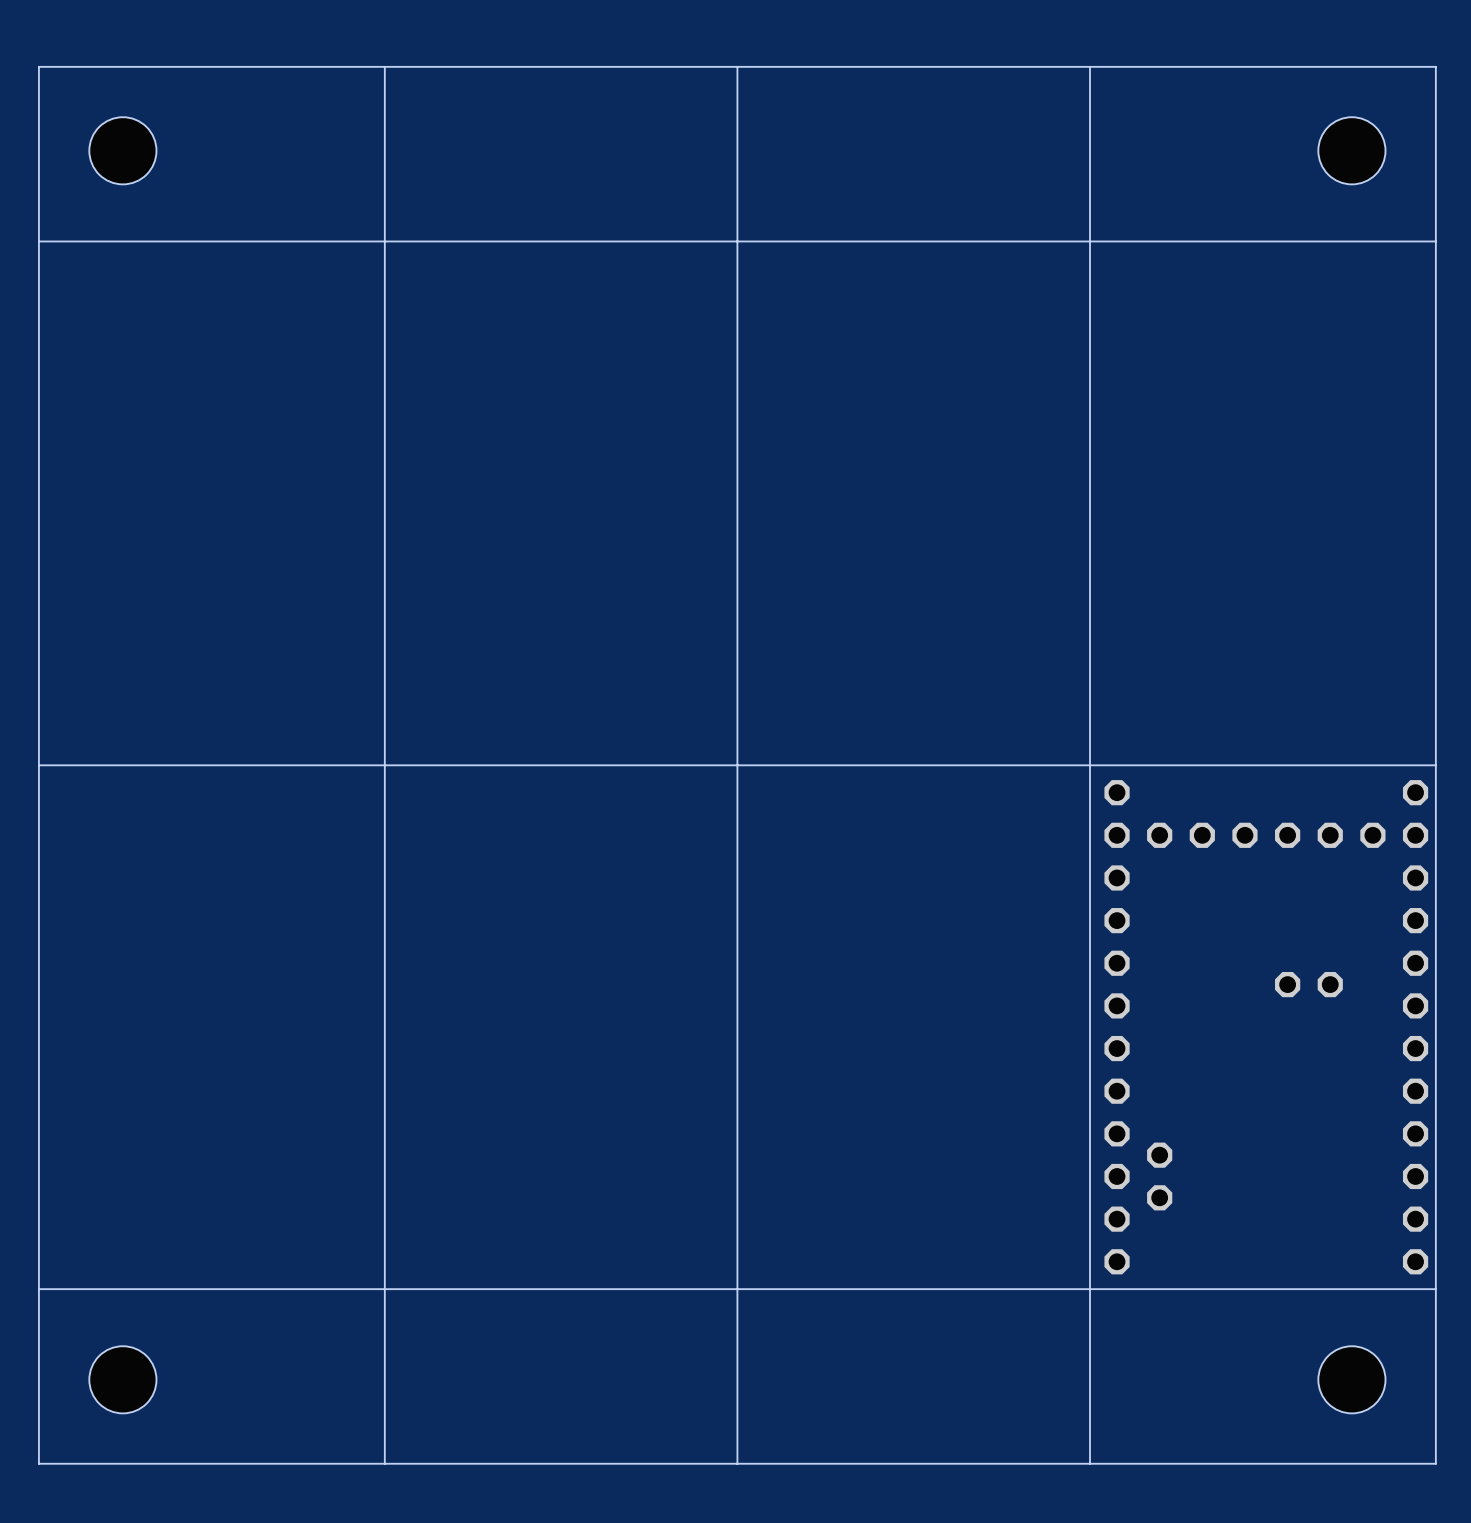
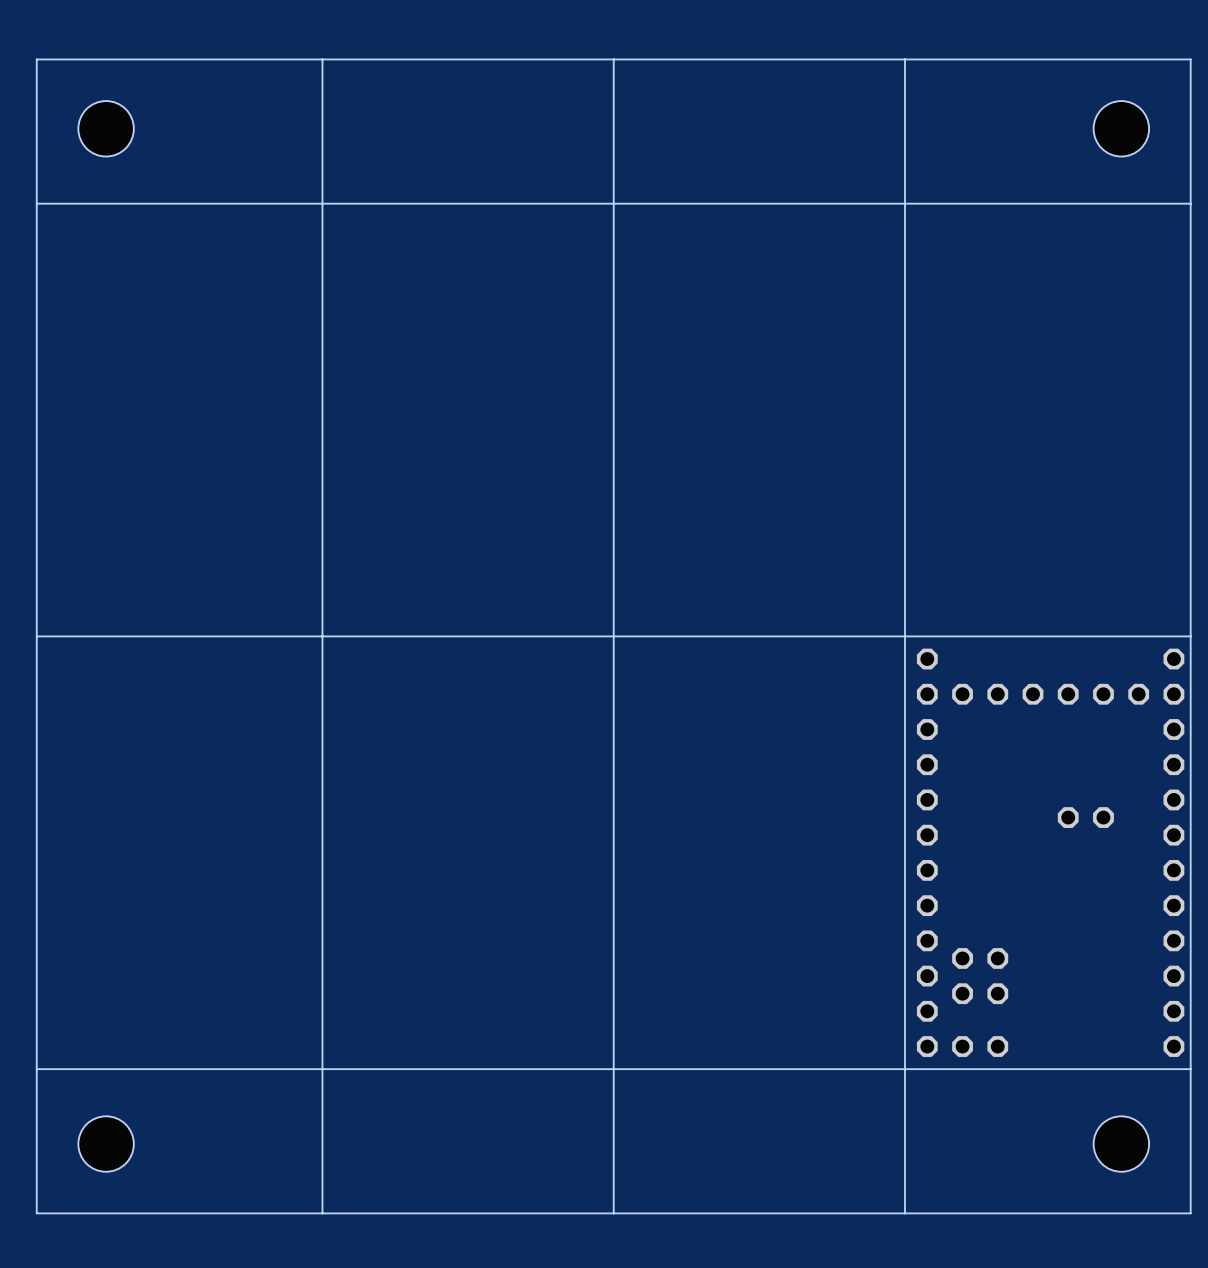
part: none -> (997, 976)
part: none -> (980, 1046)

